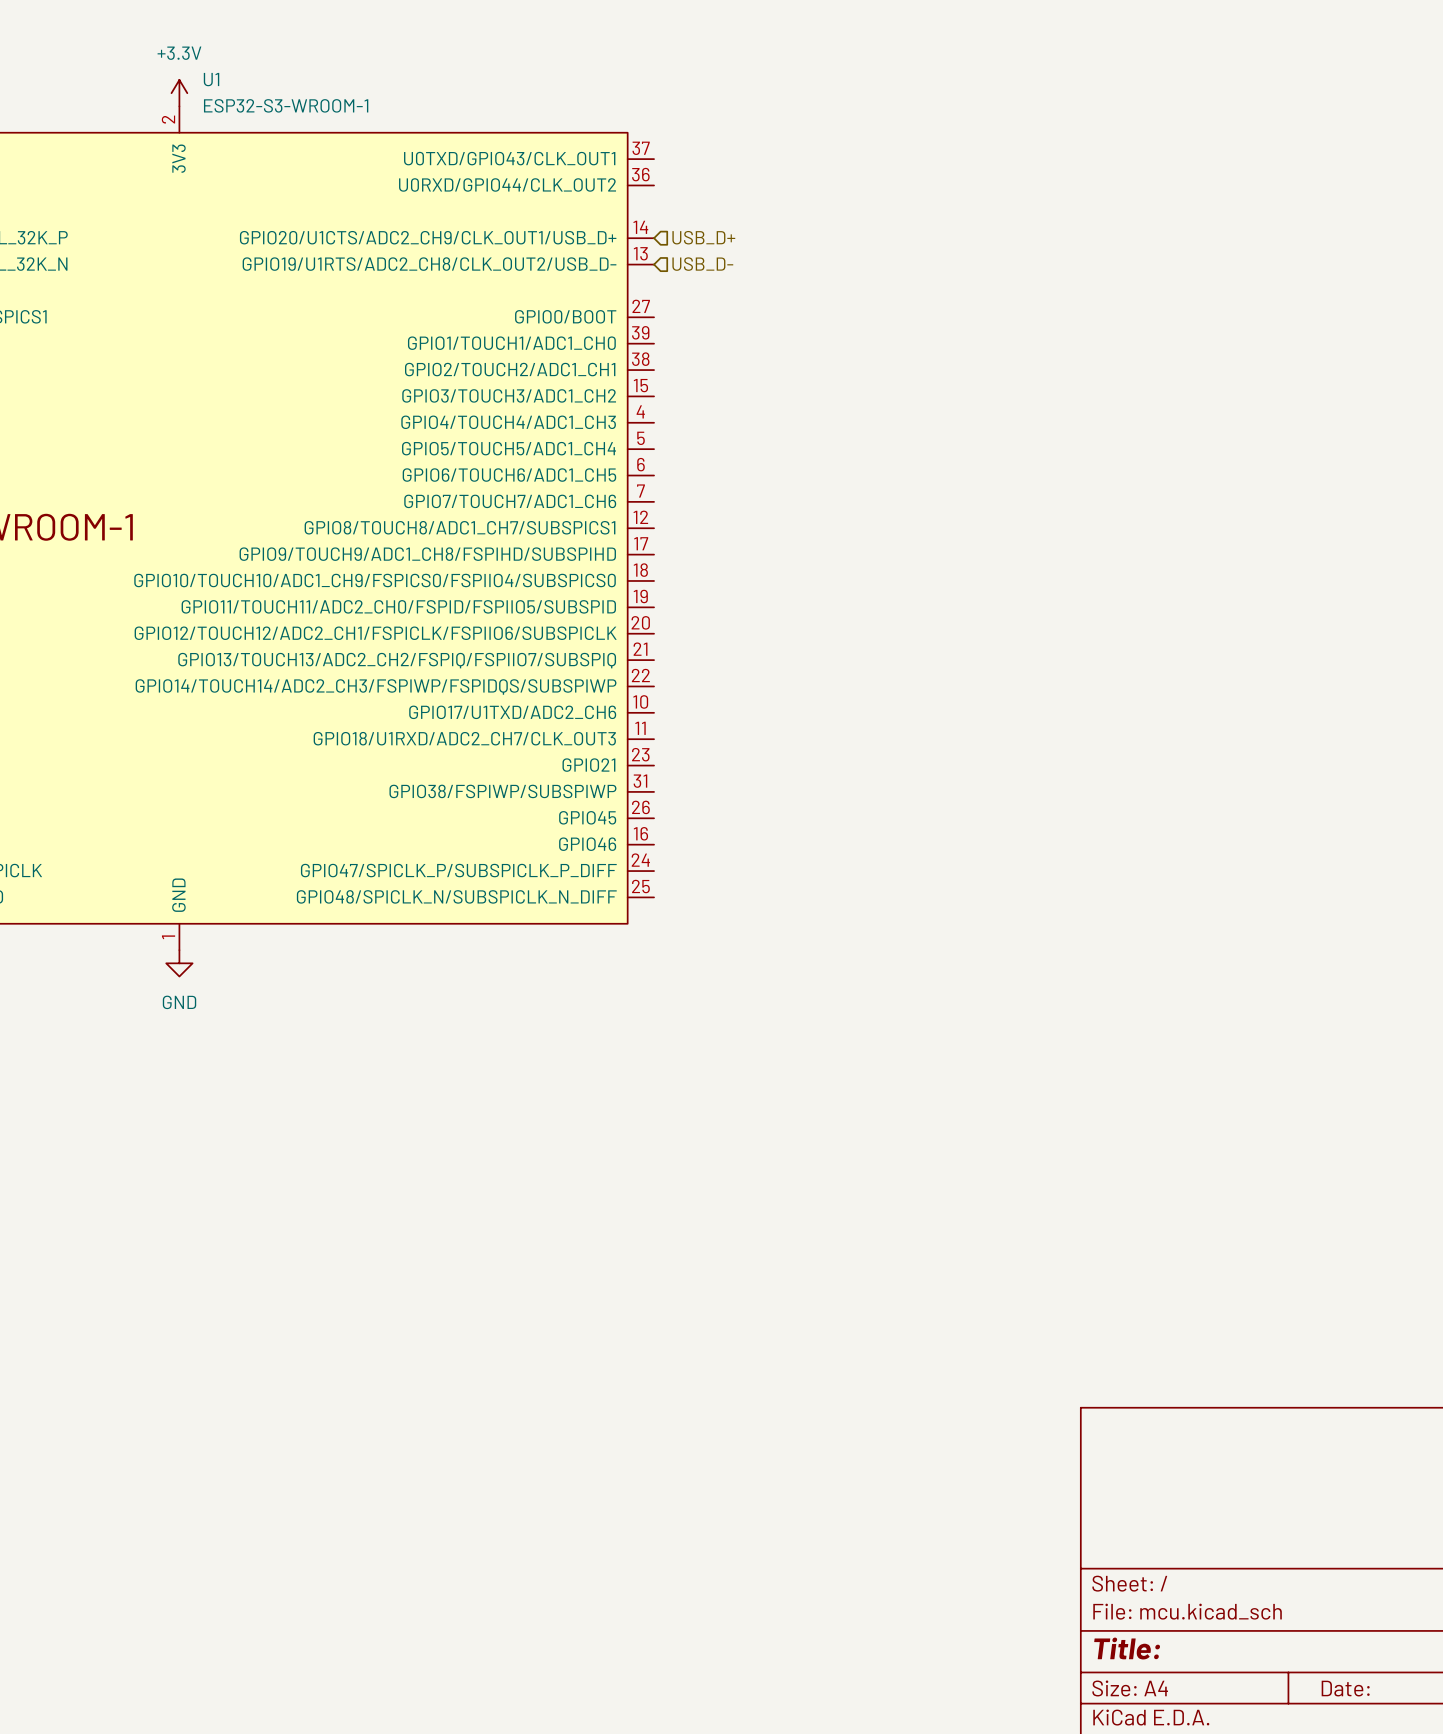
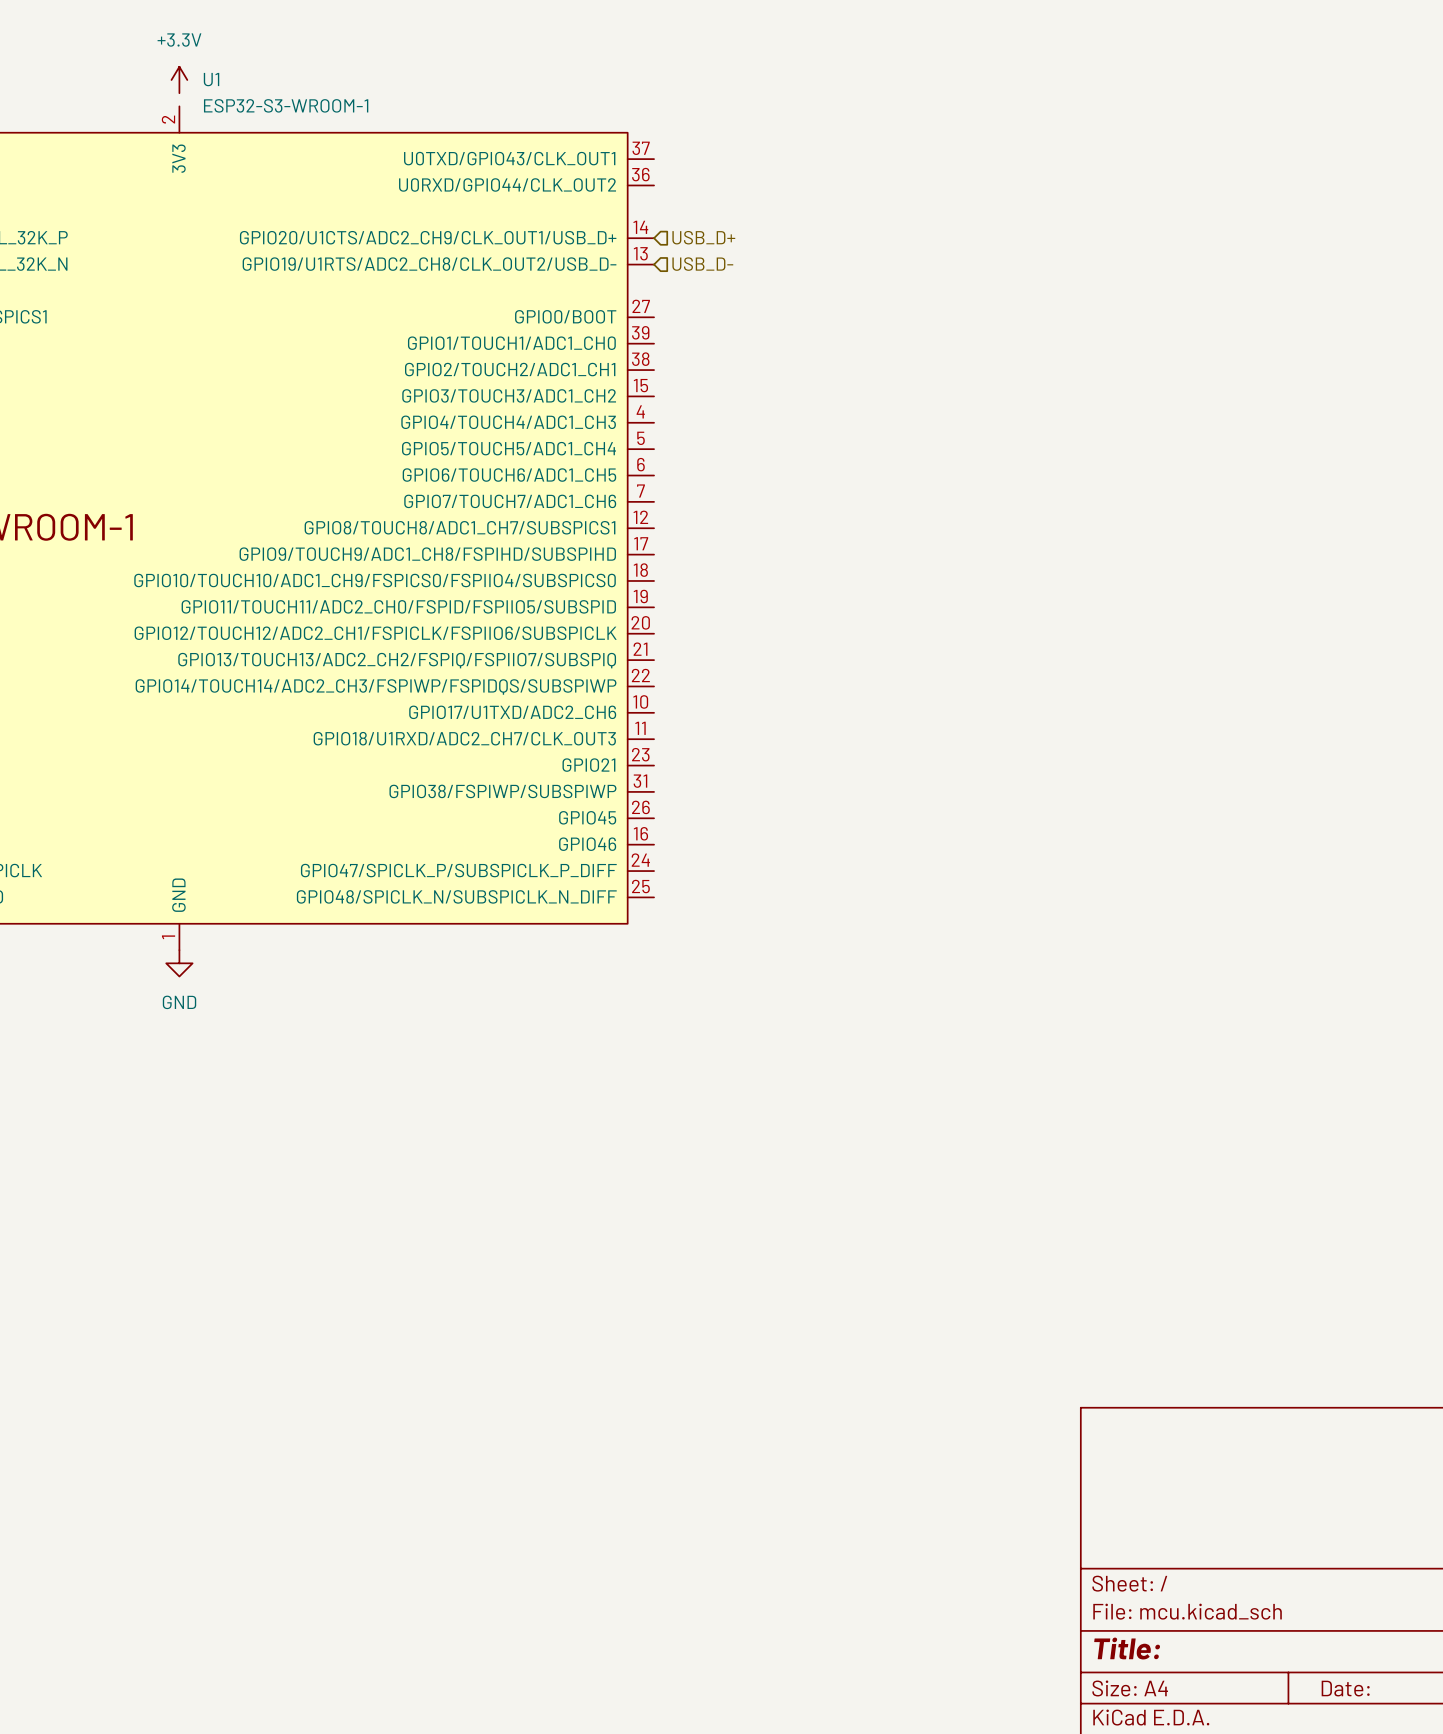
power symbol position: +3.3V (179, 93) -> +3.3V (179, 79)

